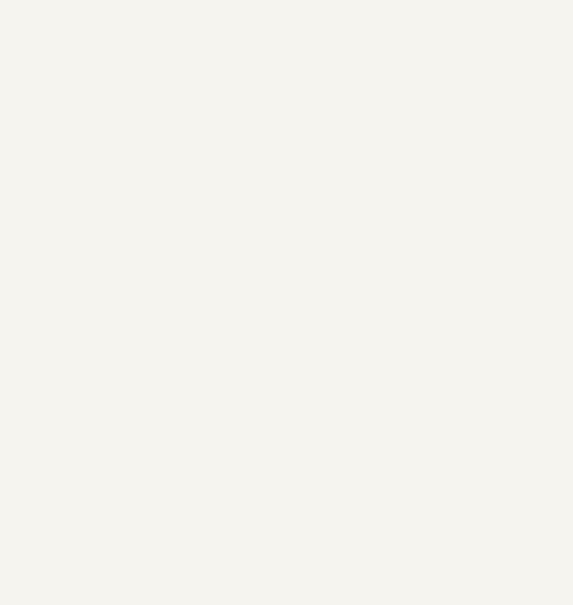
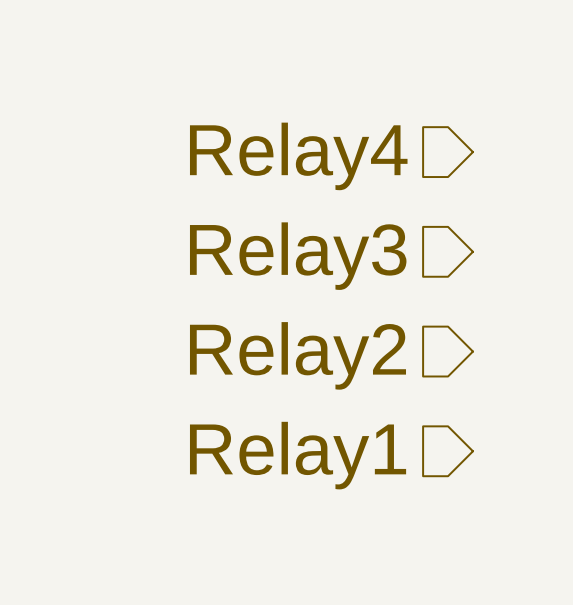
hierarchical label: none -> Relay4 (298, 156)
hierarchical label: none -> Relay3 (298, 256)
hierarchical label: none -> Relay2 (297, 355)
hierarchical label: none -> Relay1 (298, 455)

